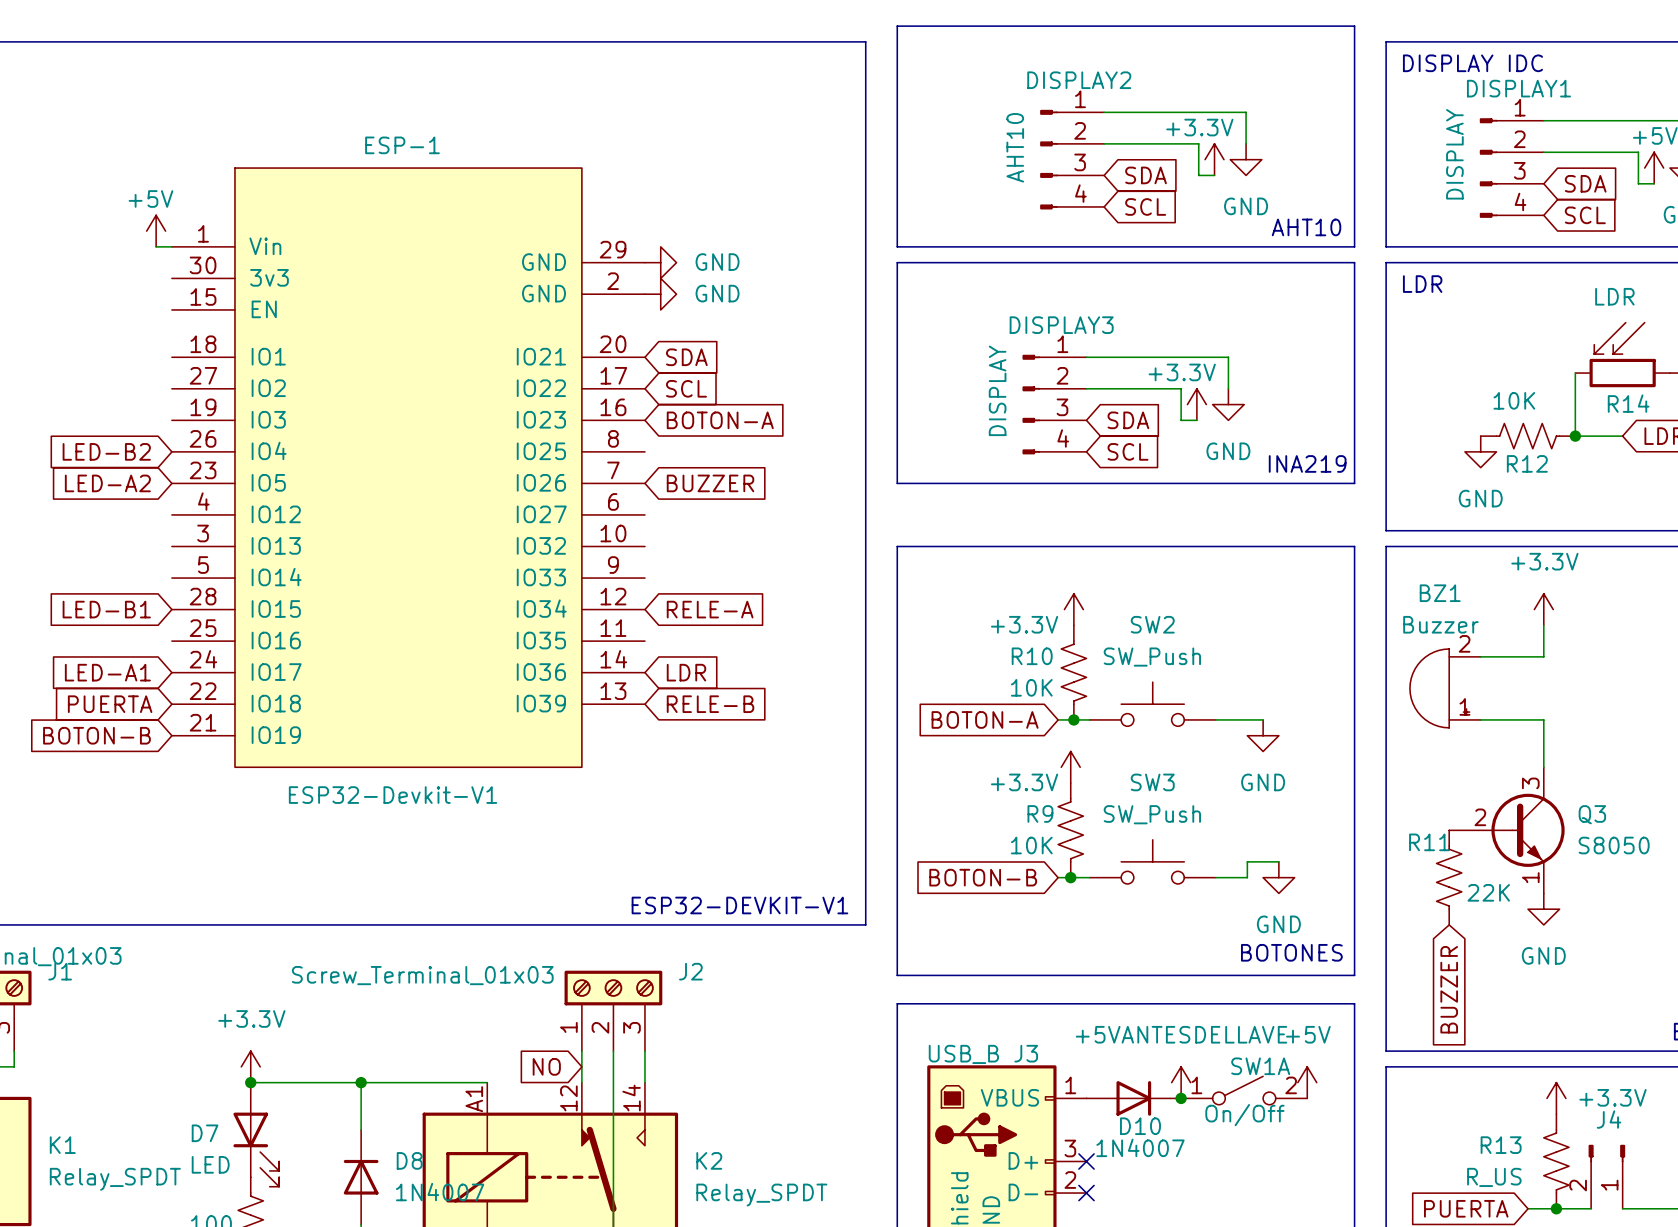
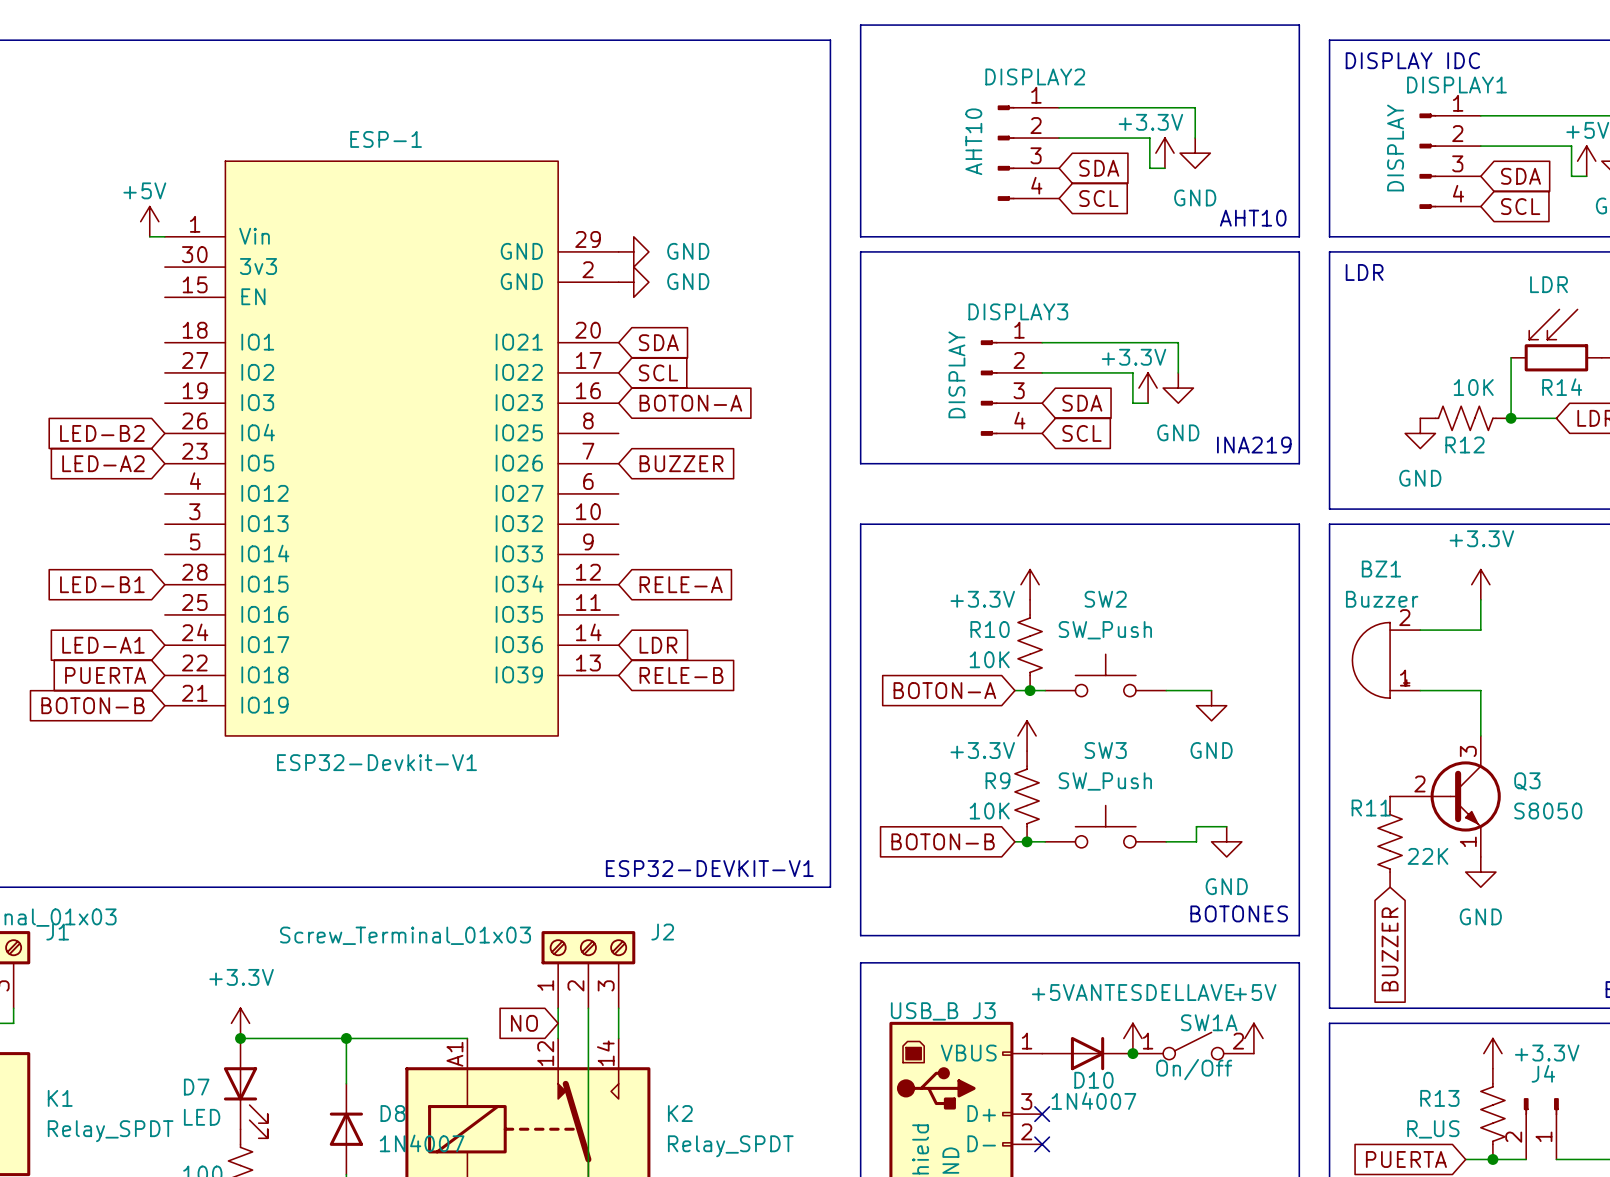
R12 value position: 10K (1514, 400) -> 10K (1473, 387)

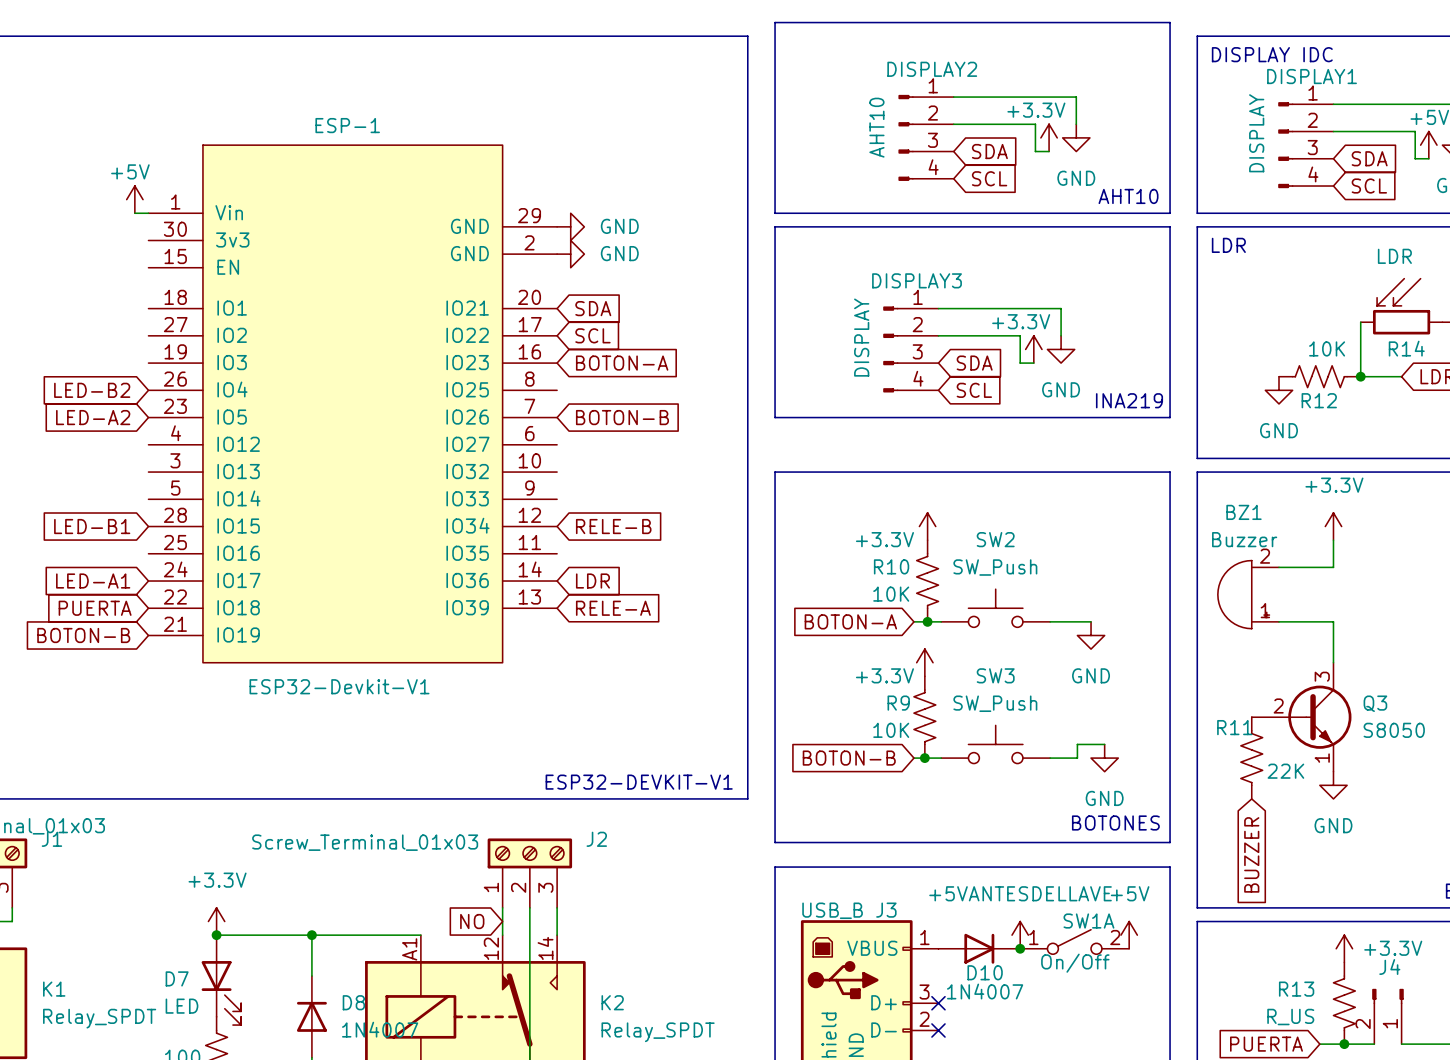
global label: BUZZER (681, 463) -> BOTON-B (622, 417)
global label: RELE-A (681, 584) -> RELE-B (613, 526)
global label: RELE-B (681, 675) -> RELE-A (613, 608)

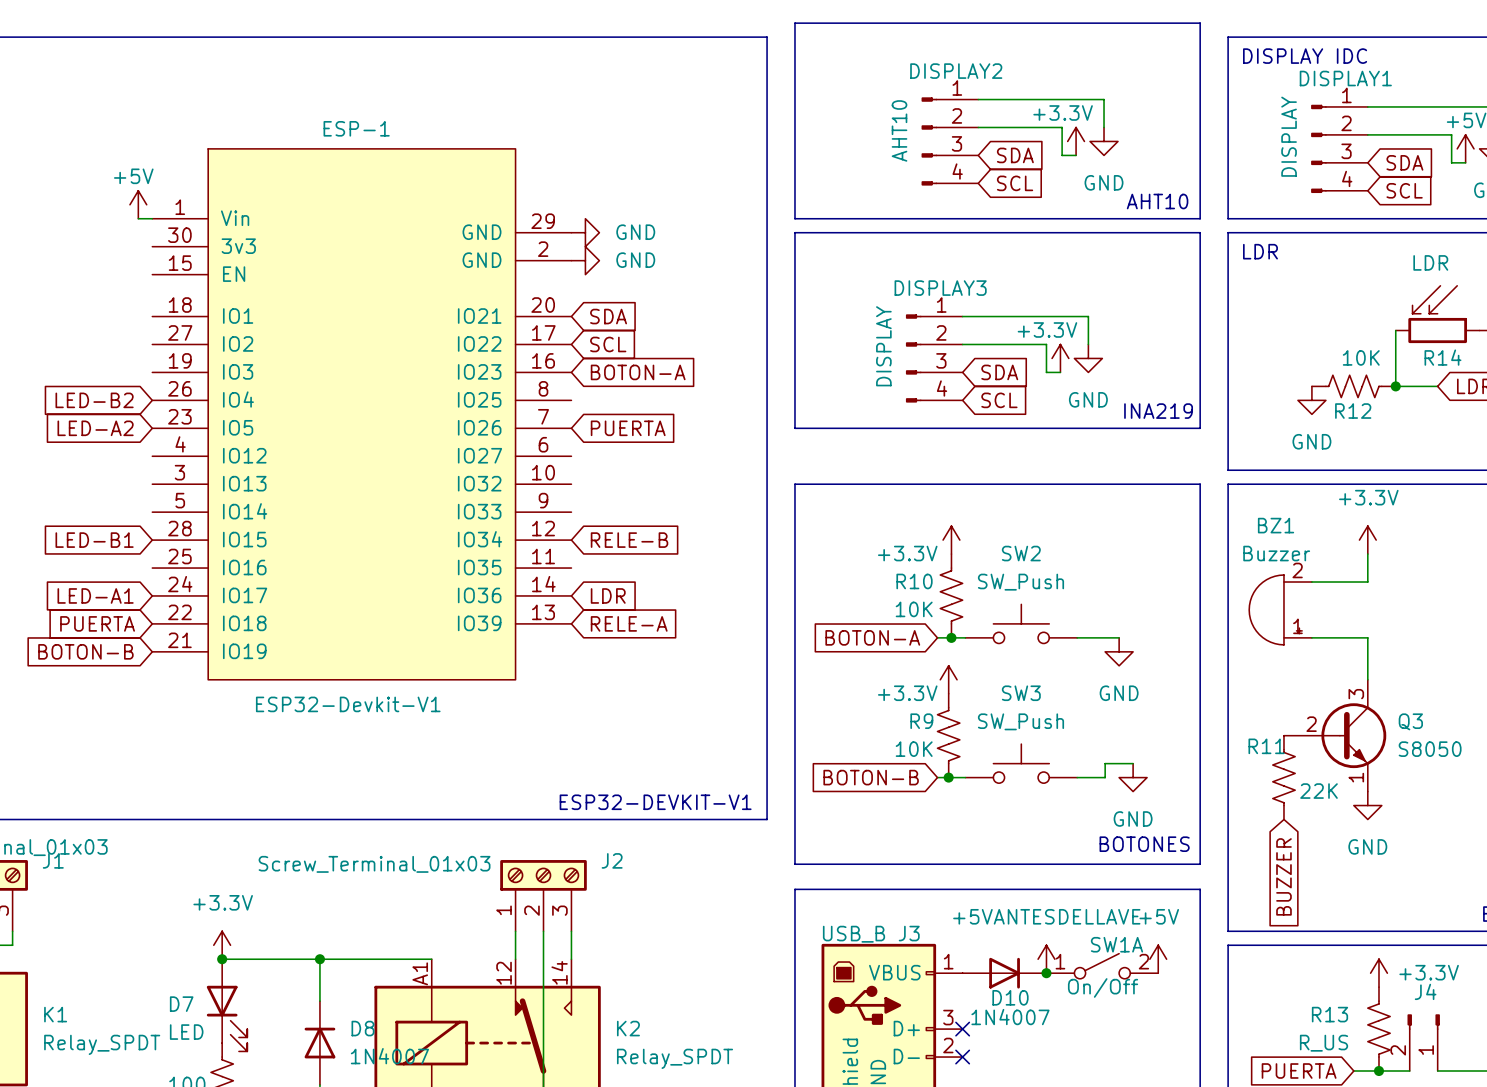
global label: BOTON-B (622, 417) -> PUERTA (628, 428)
global label: NO (472, 921) -> none

